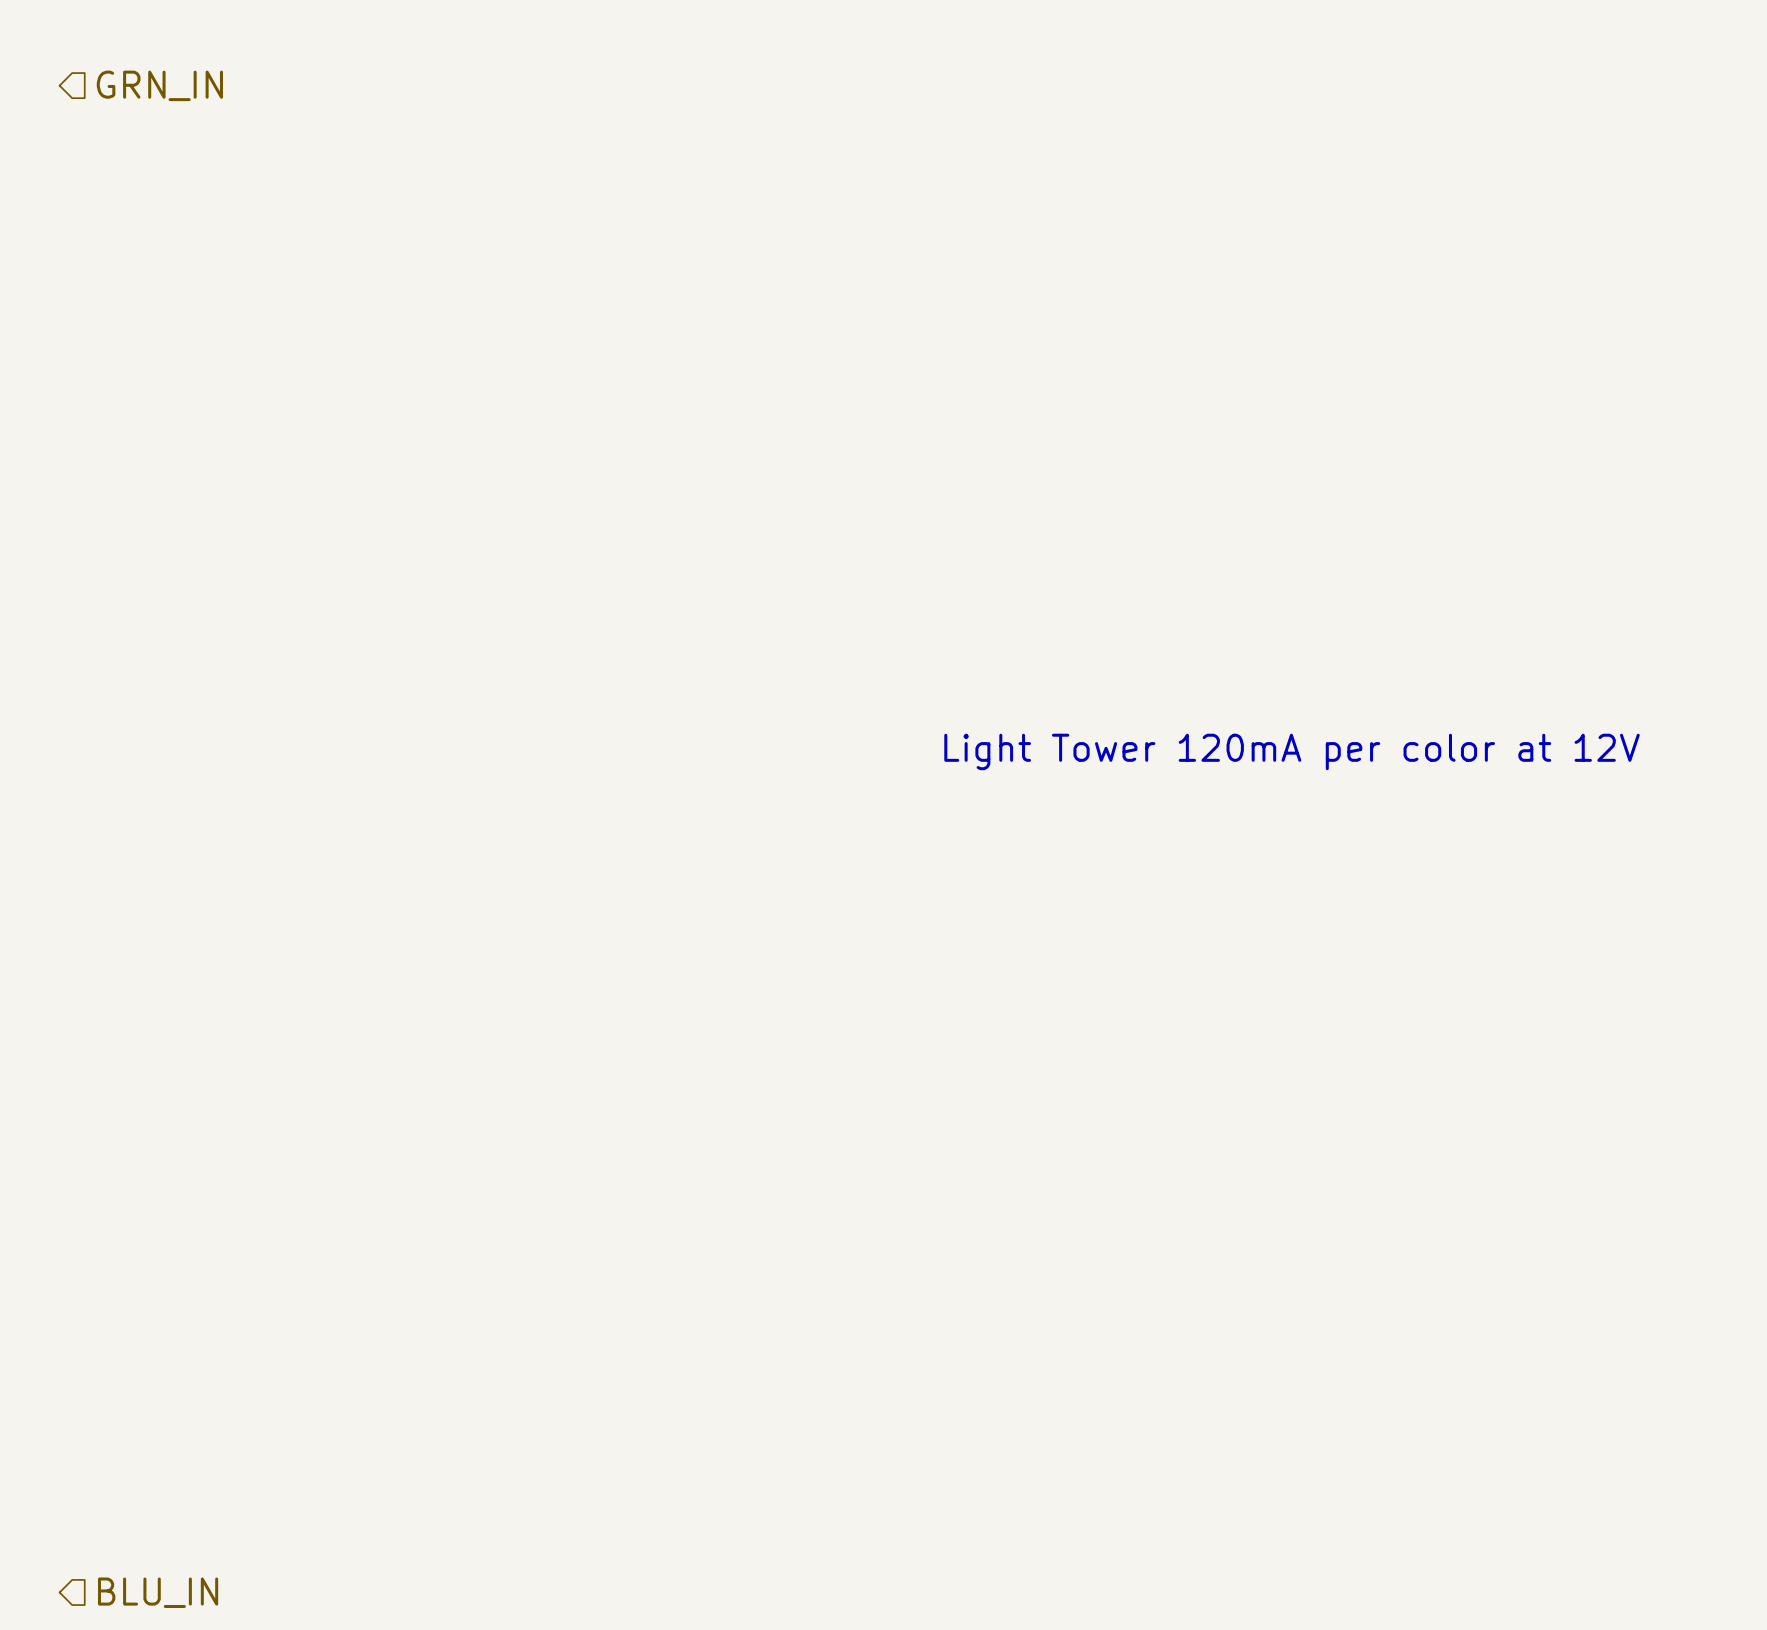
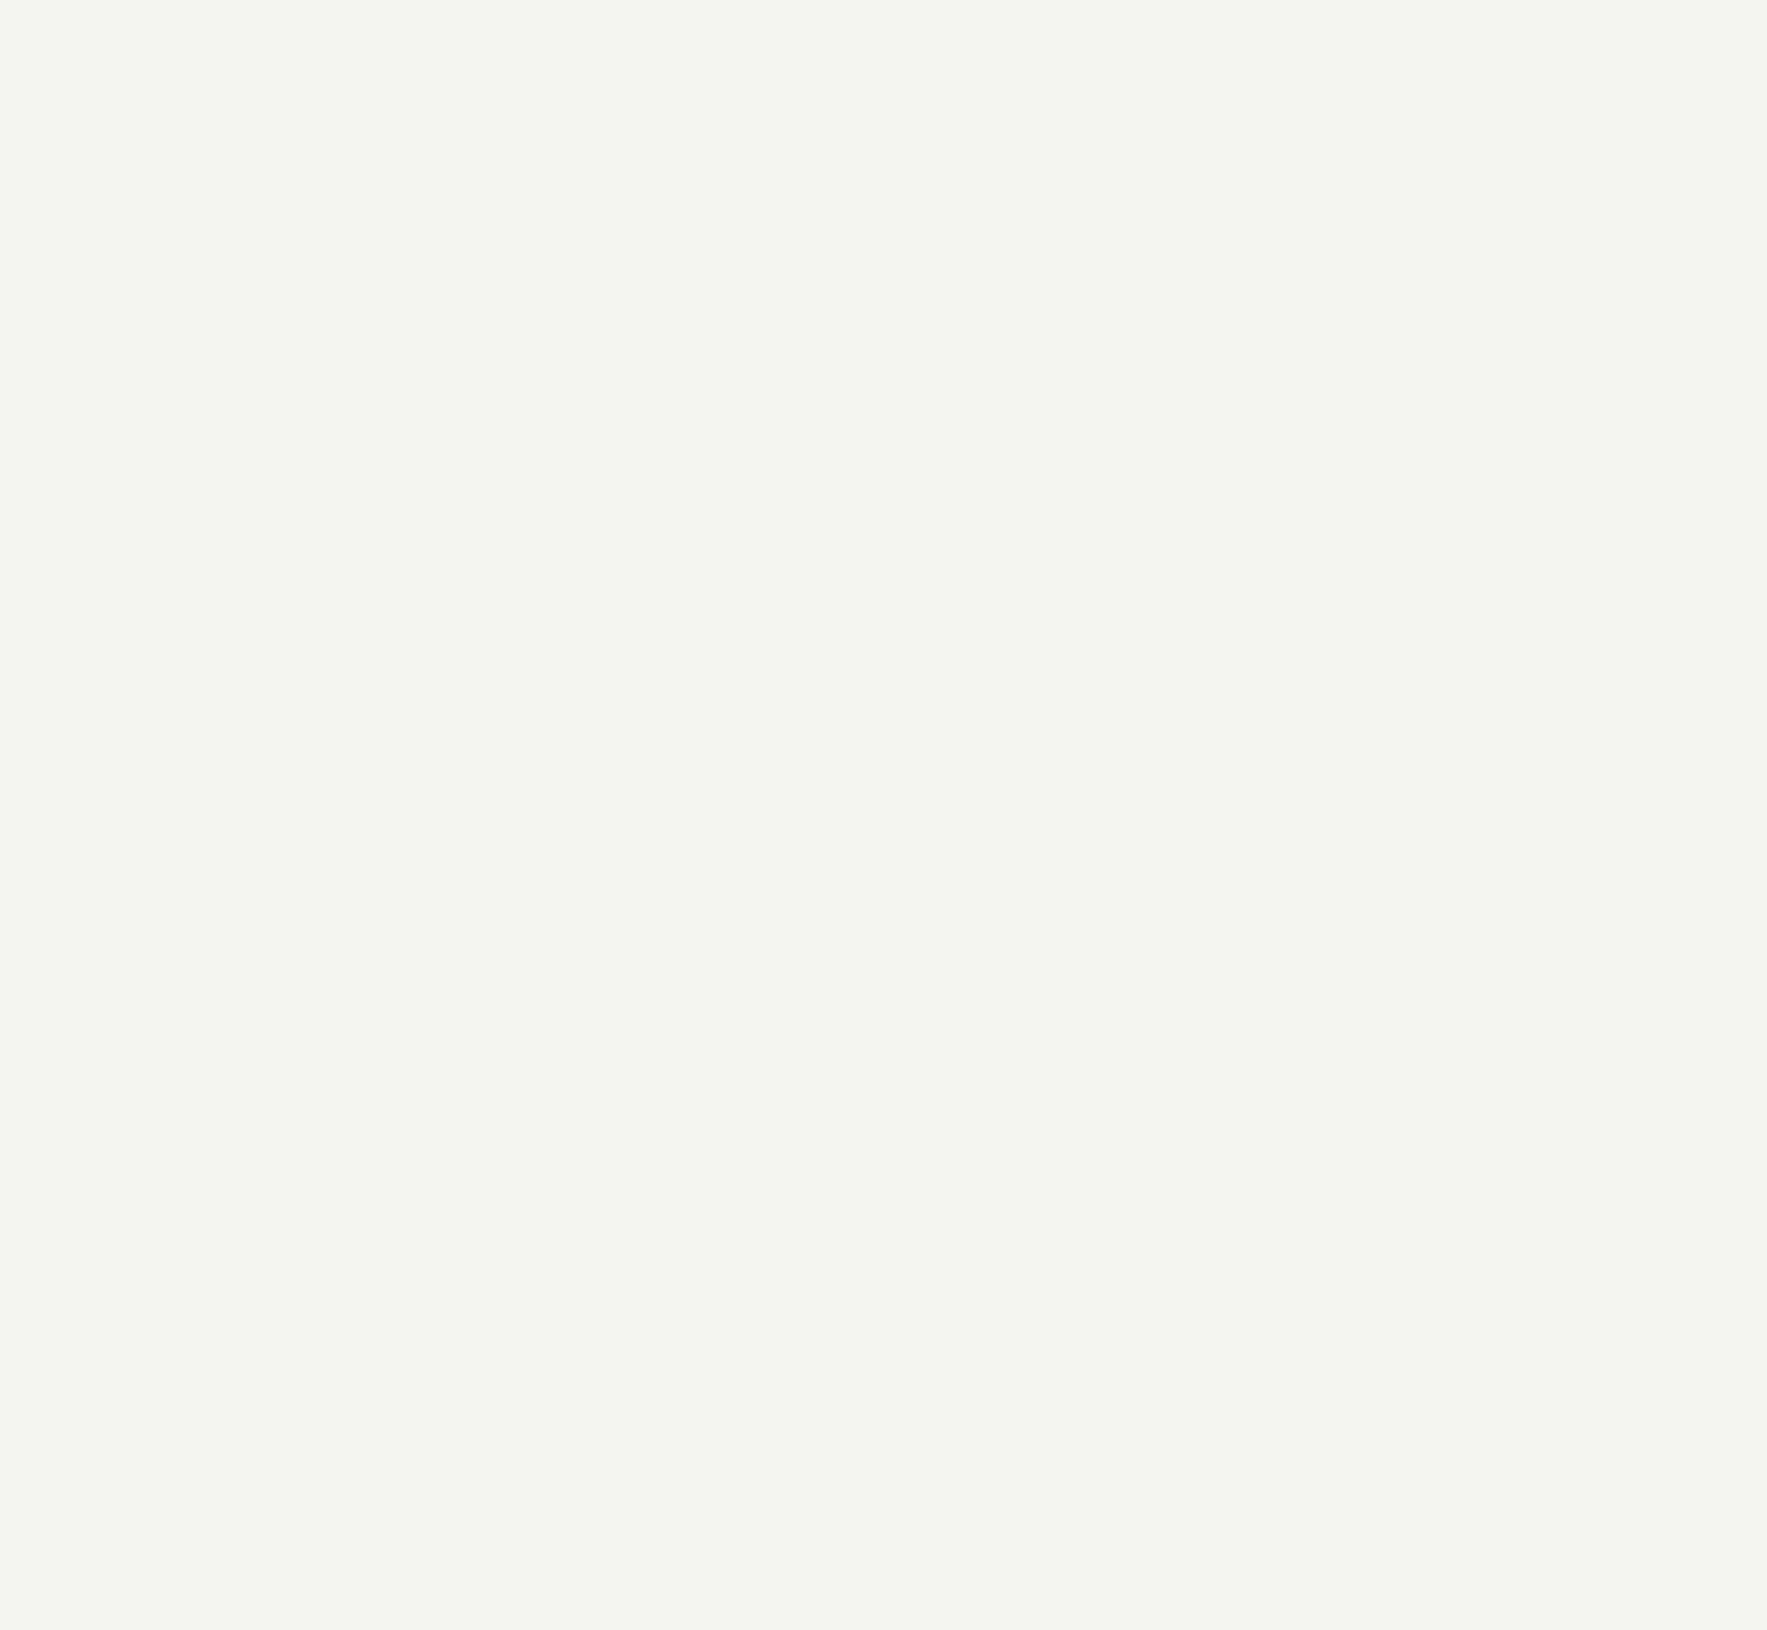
hierarchical label: GRN_IN (159, 85) -> none
text: Light Tower 120mA per color at 12V (1292, 751) -> none
hierarchical label: BLU_IN (158, 1592) -> none

